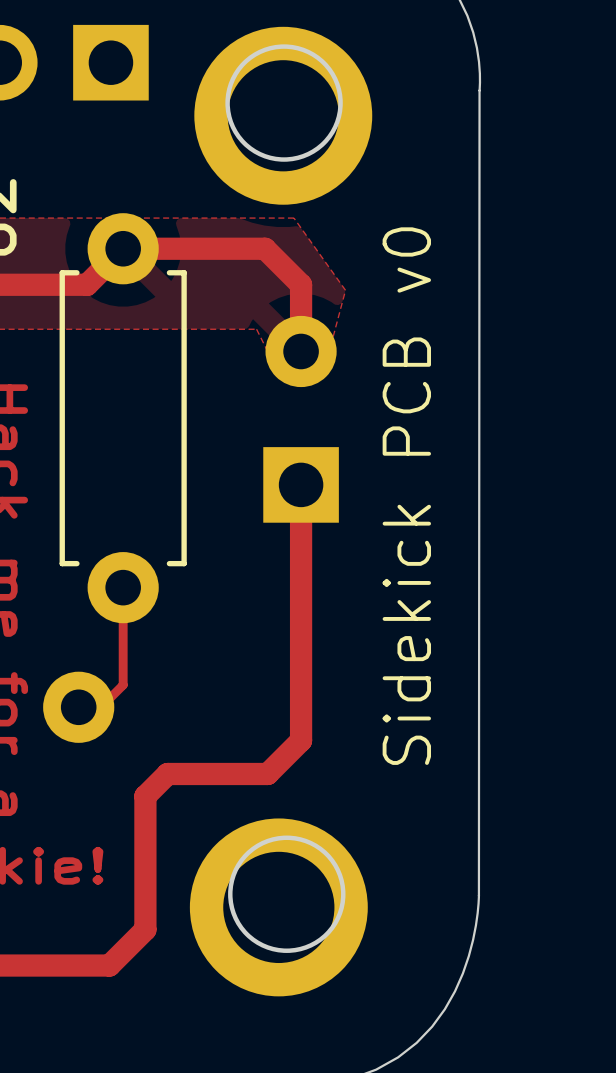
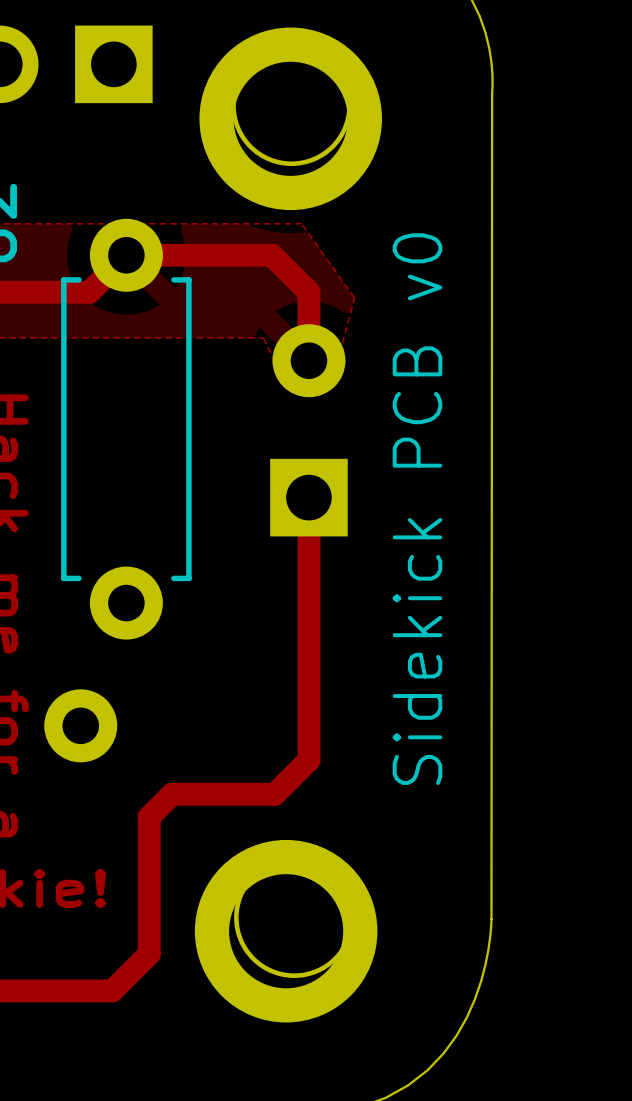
track: (123, 587) (123, 685) (100, 707) (78, 707) -> none

